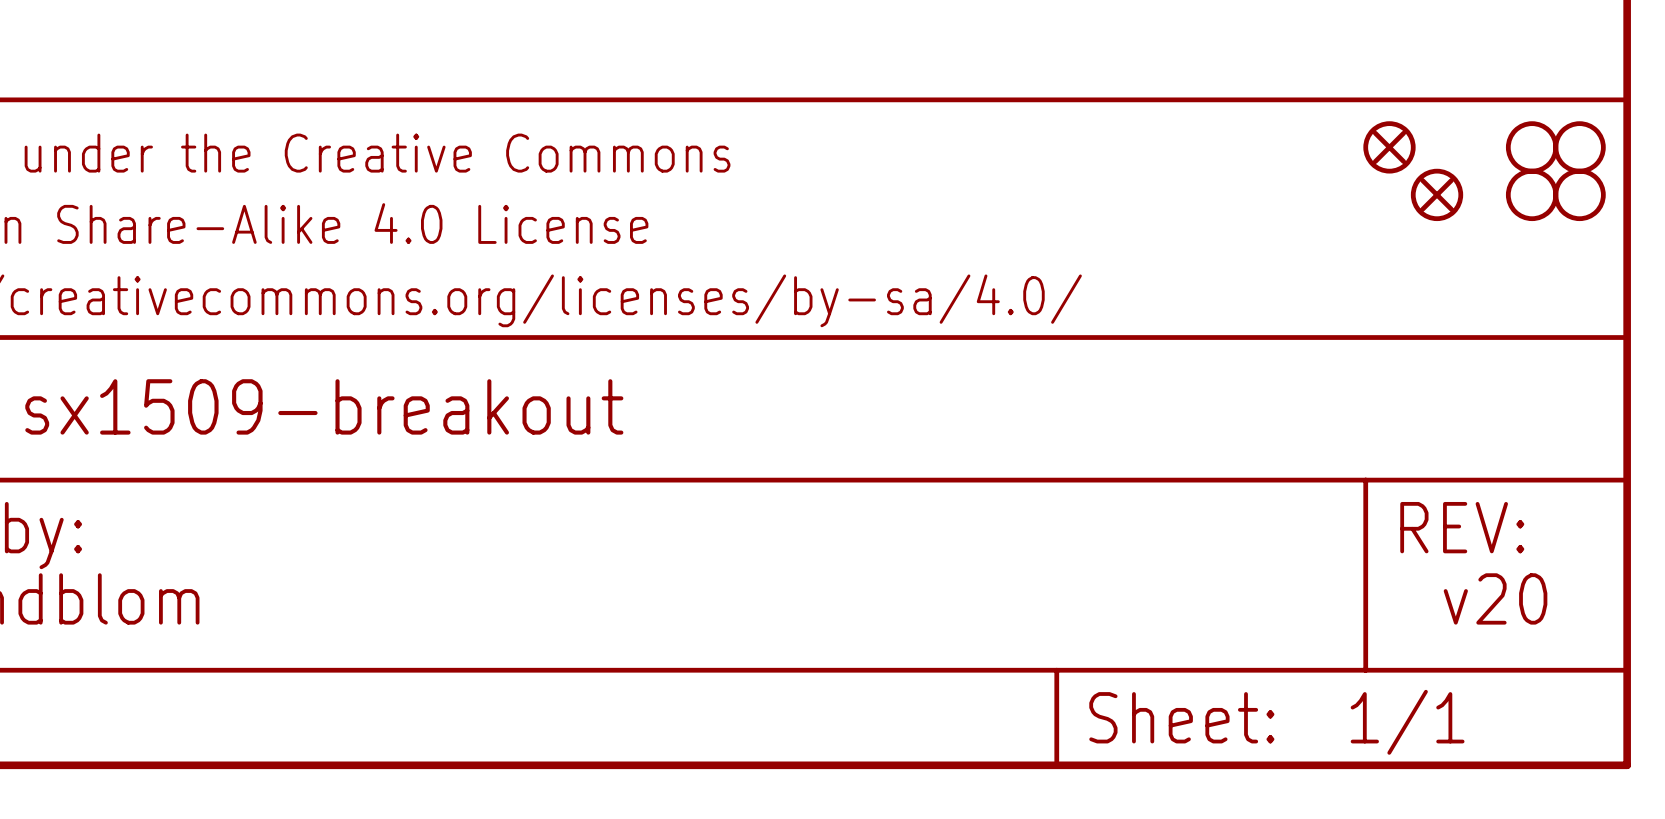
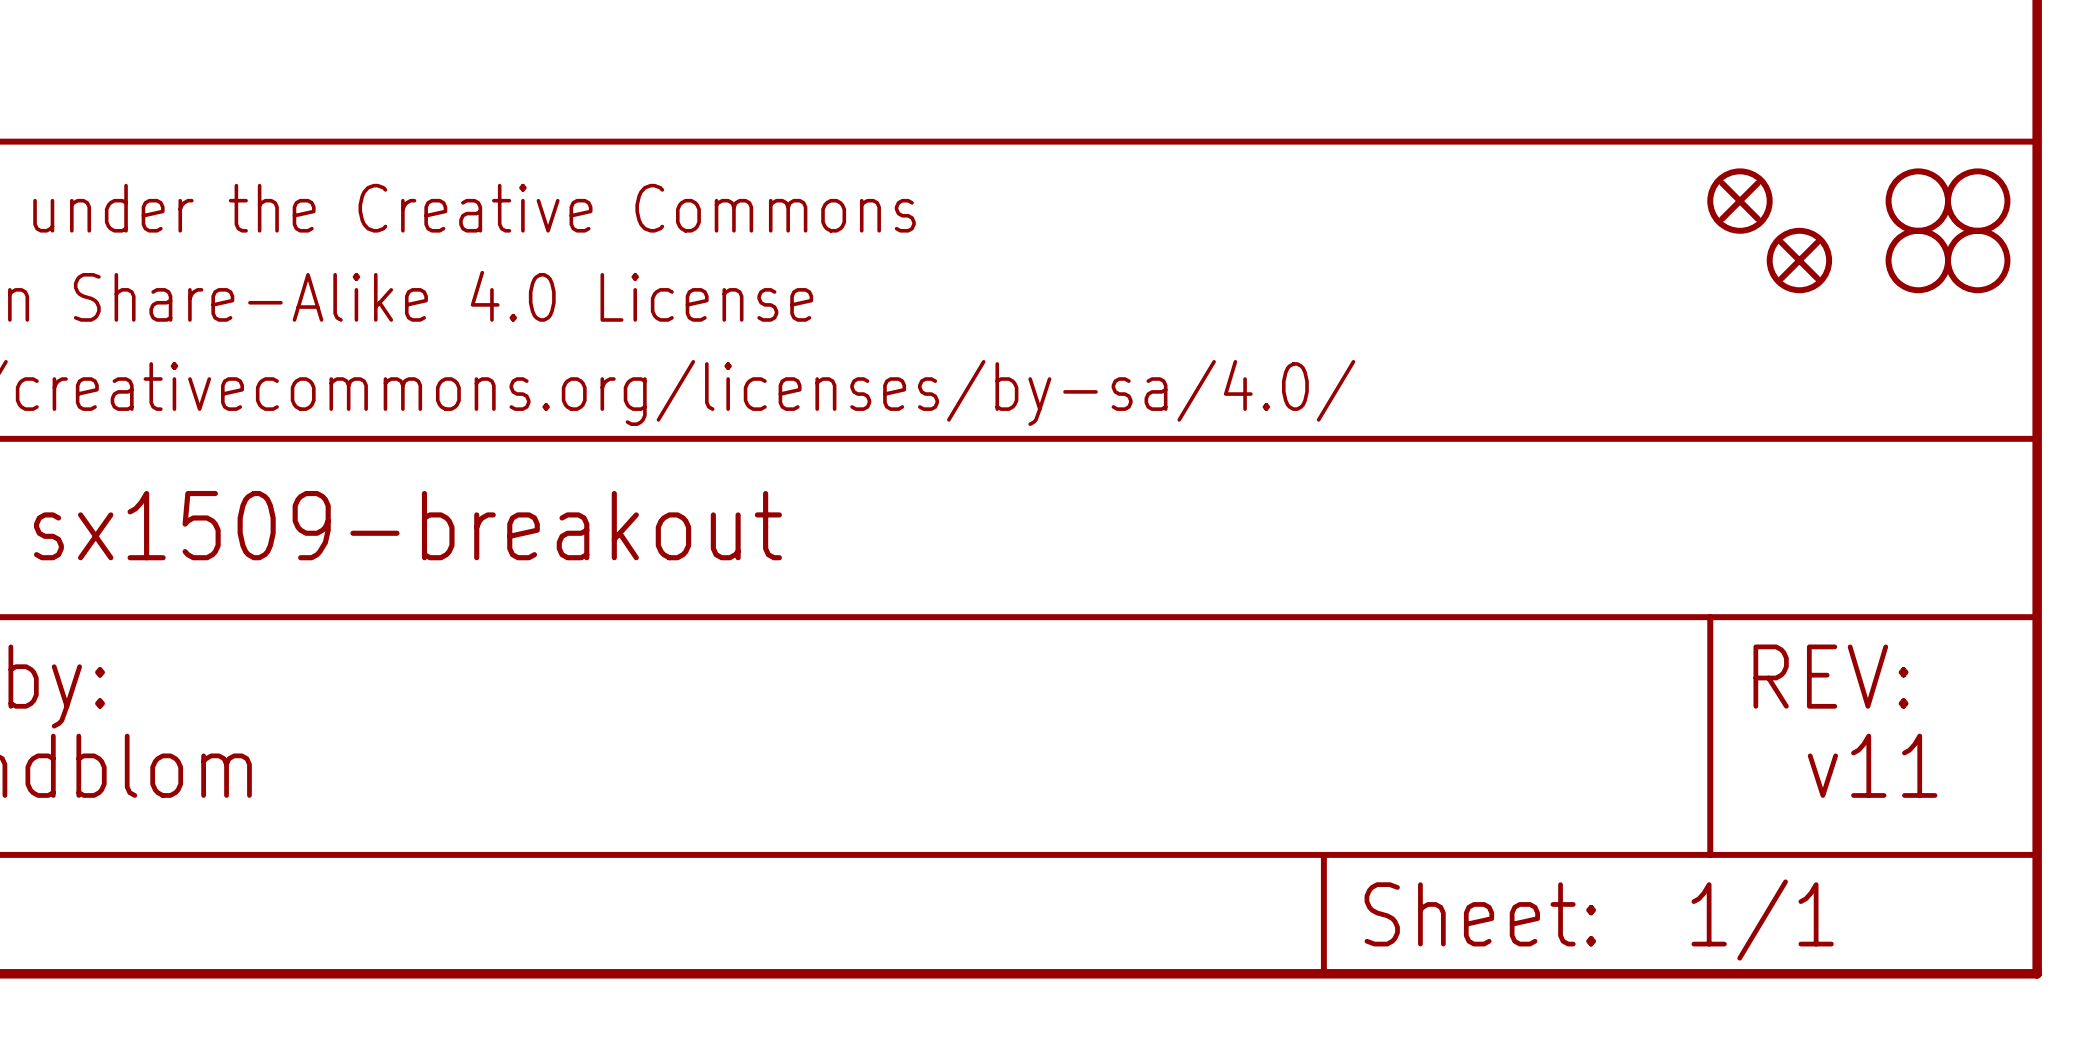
text: v20 (1495, 598) -> v11 (1872, 765)

